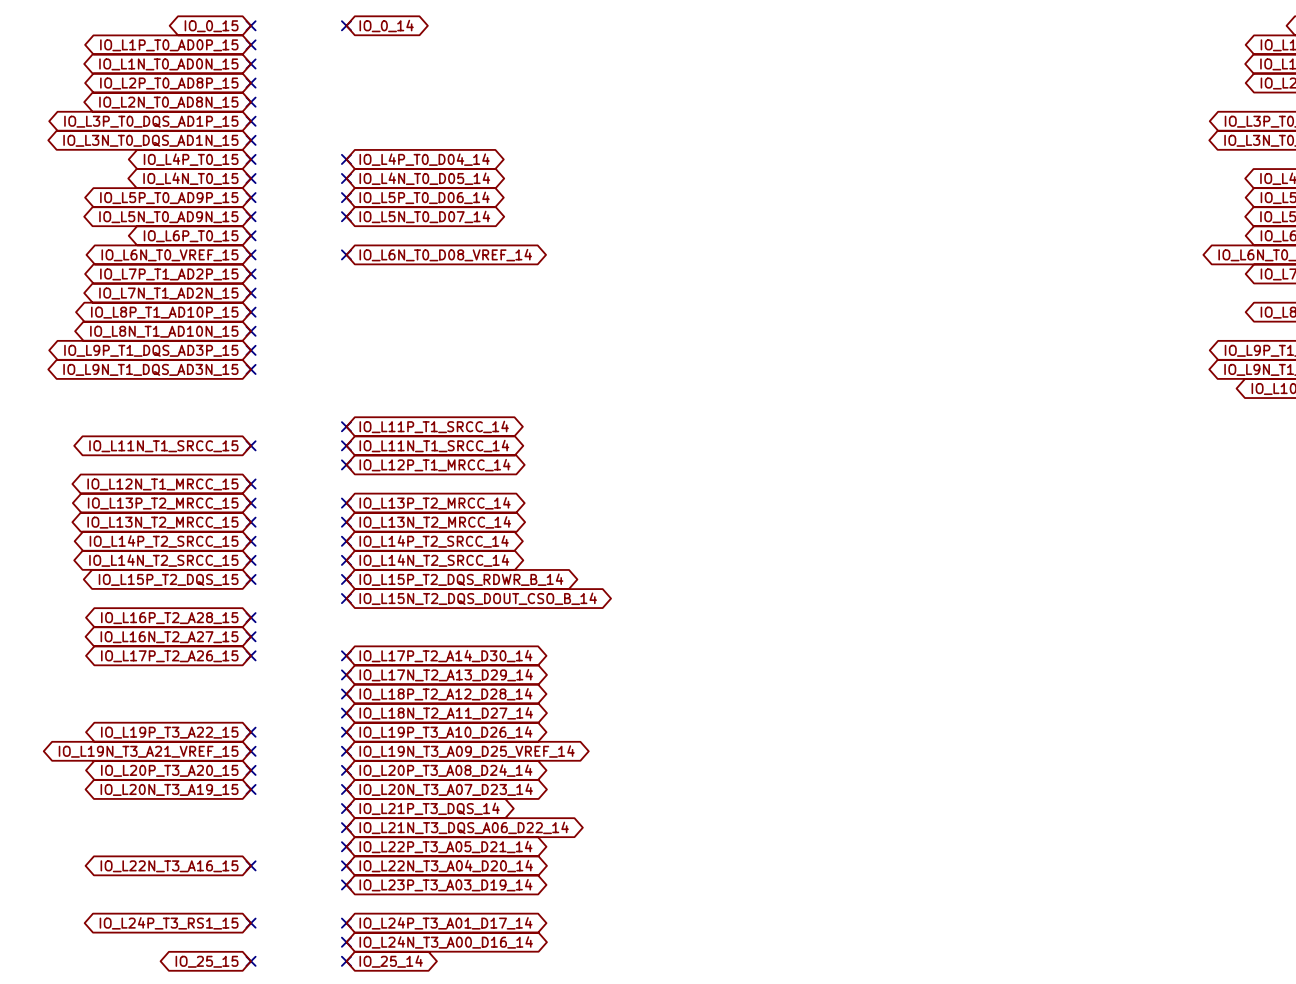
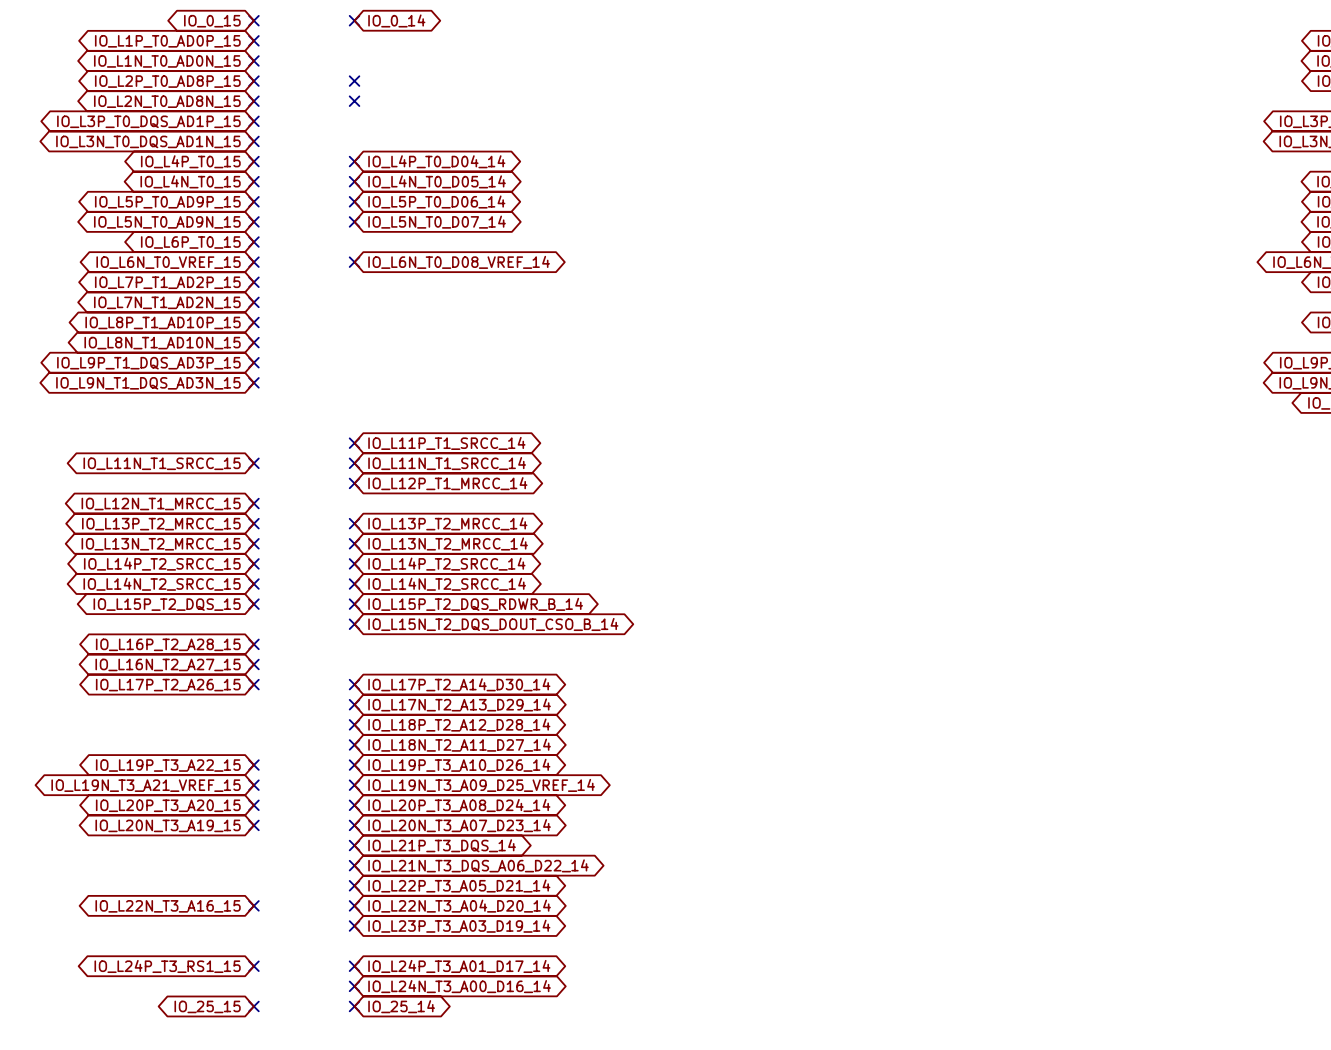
no-connect mark: none -> (354, 81)
no-connect mark: none -> (354, 101)

